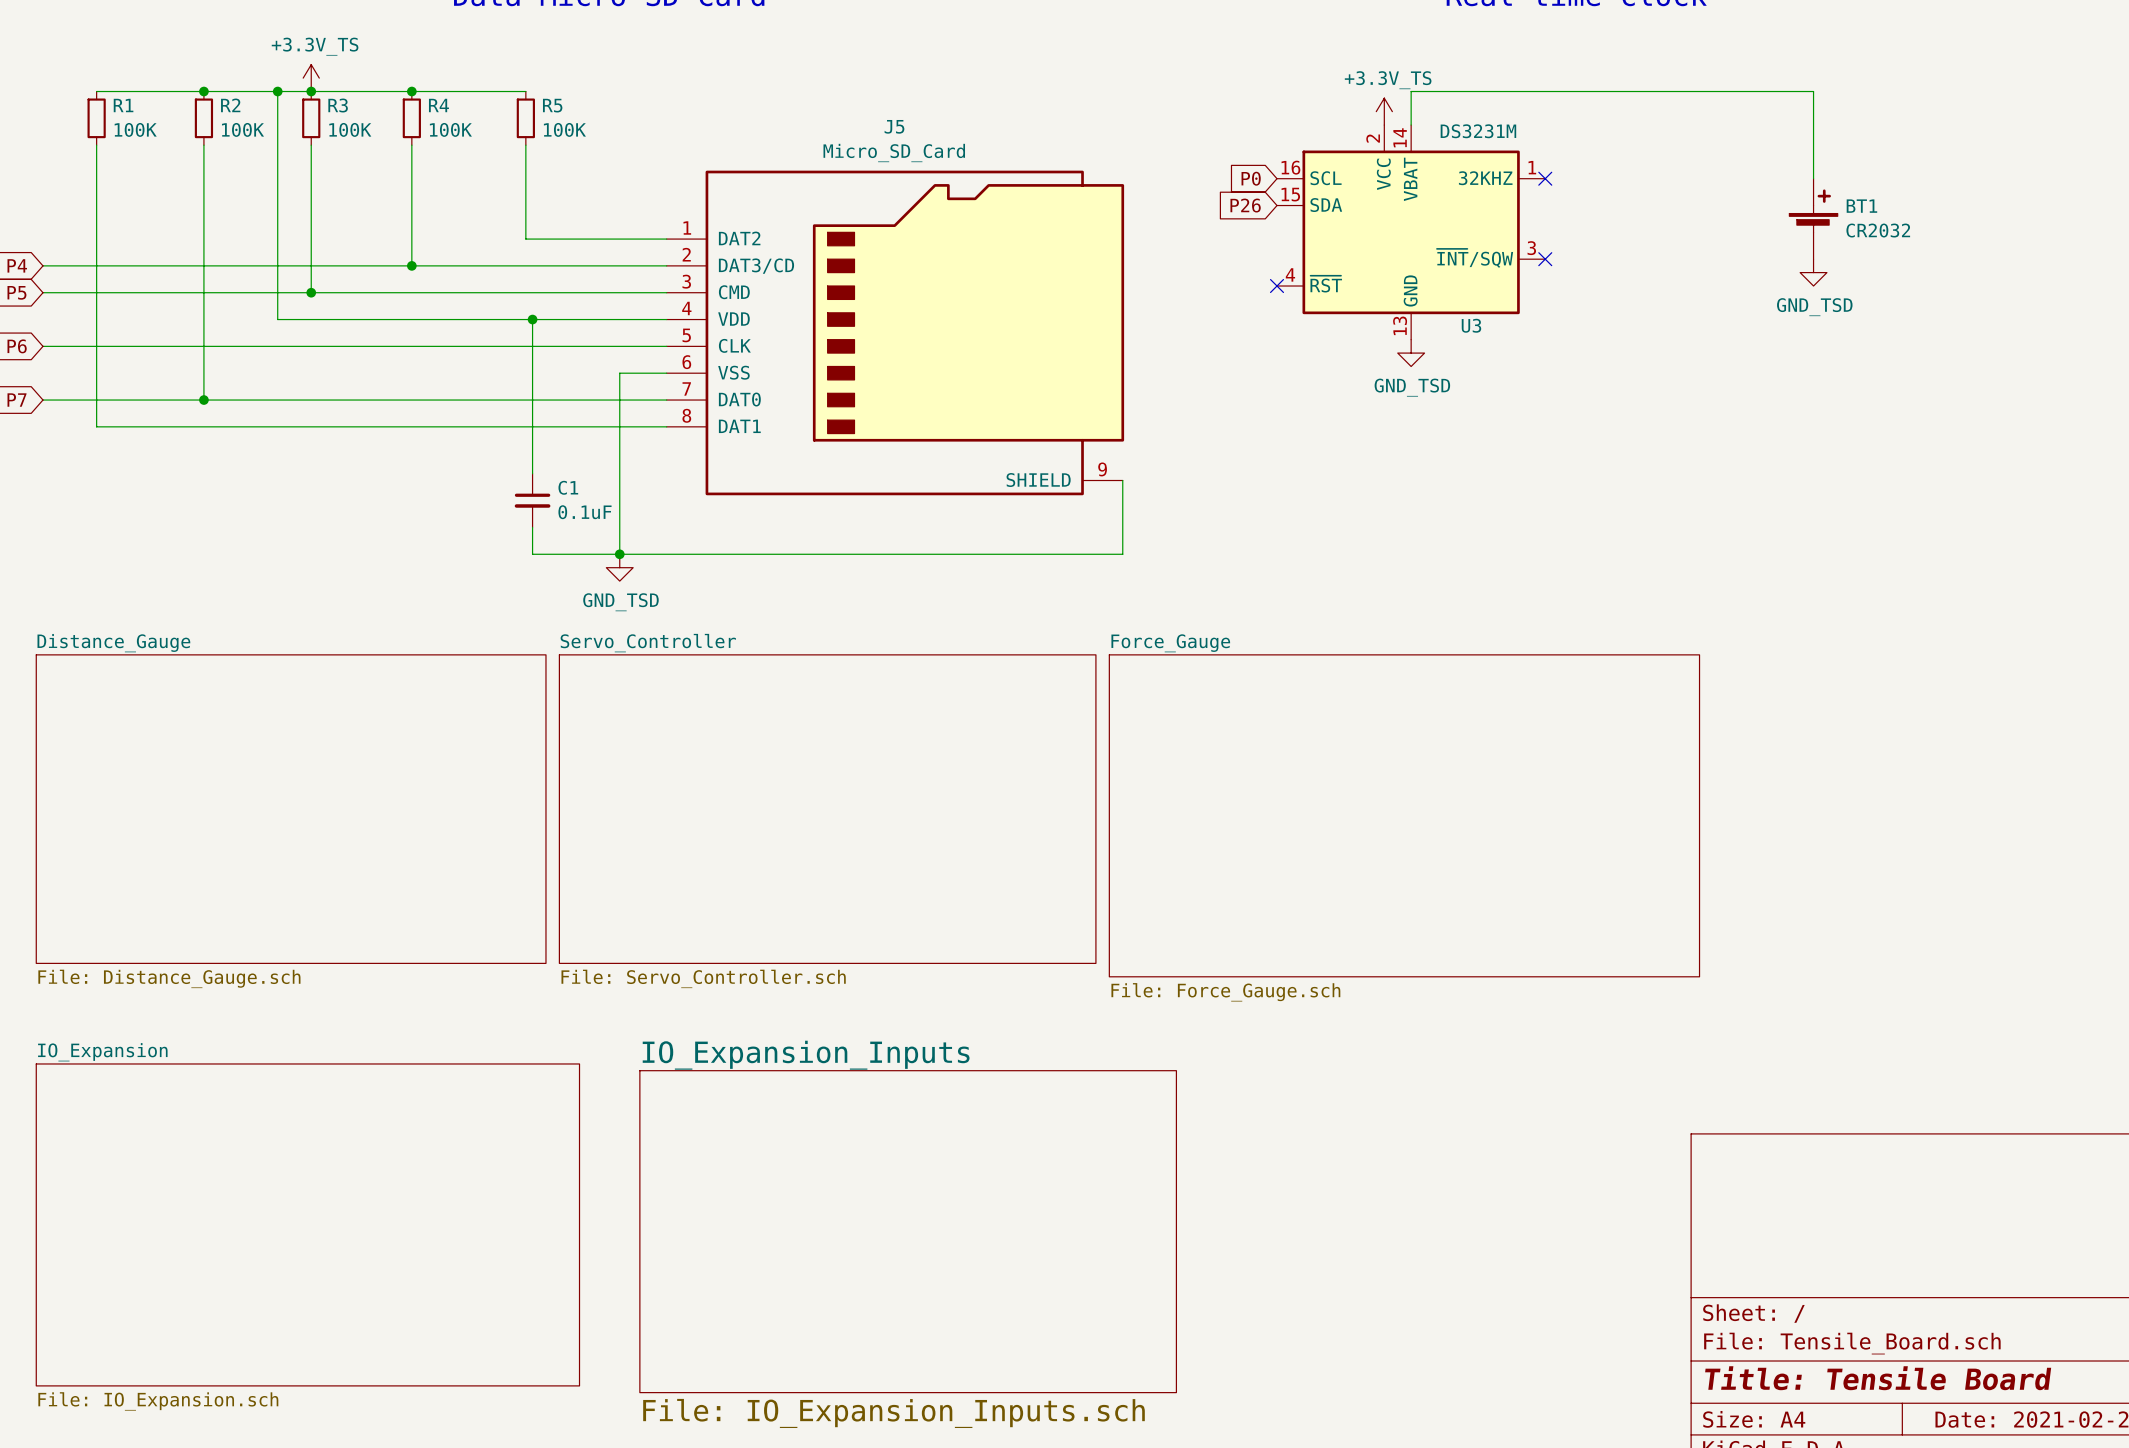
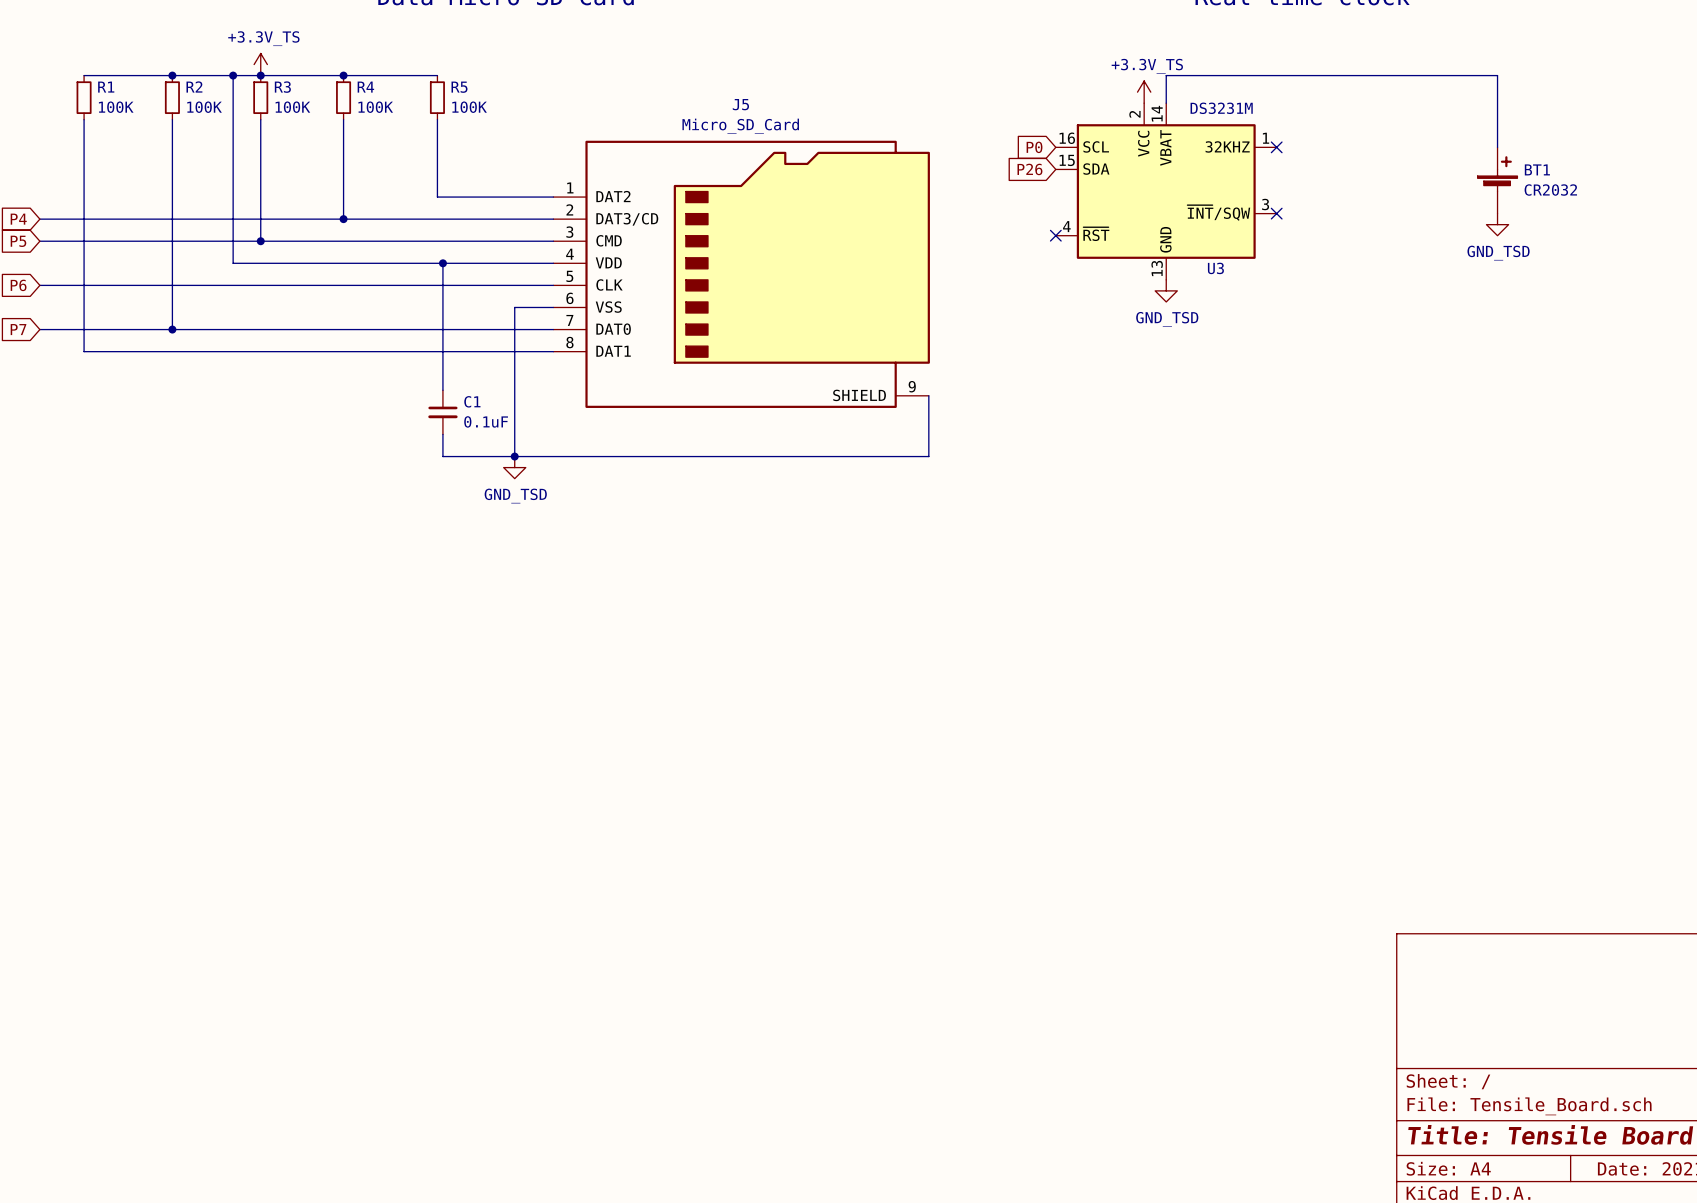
sheet Distance_Gauge: File: Distance_Gauge.sch (291, 809) -> none
sheet Servo_Controller: File: Servo_Controller.sch (827, 809) -> none
sheet Force_Gauge: File: Force_Gauge.sch (1404, 815) -> none
sheet IO_Expansion: File: IO_Expansion.sch (307, 1224) -> none
sheet IO_Expansion_Inputs: File: IO_Expansion_Inputs.sch (908, 1231) -> none

